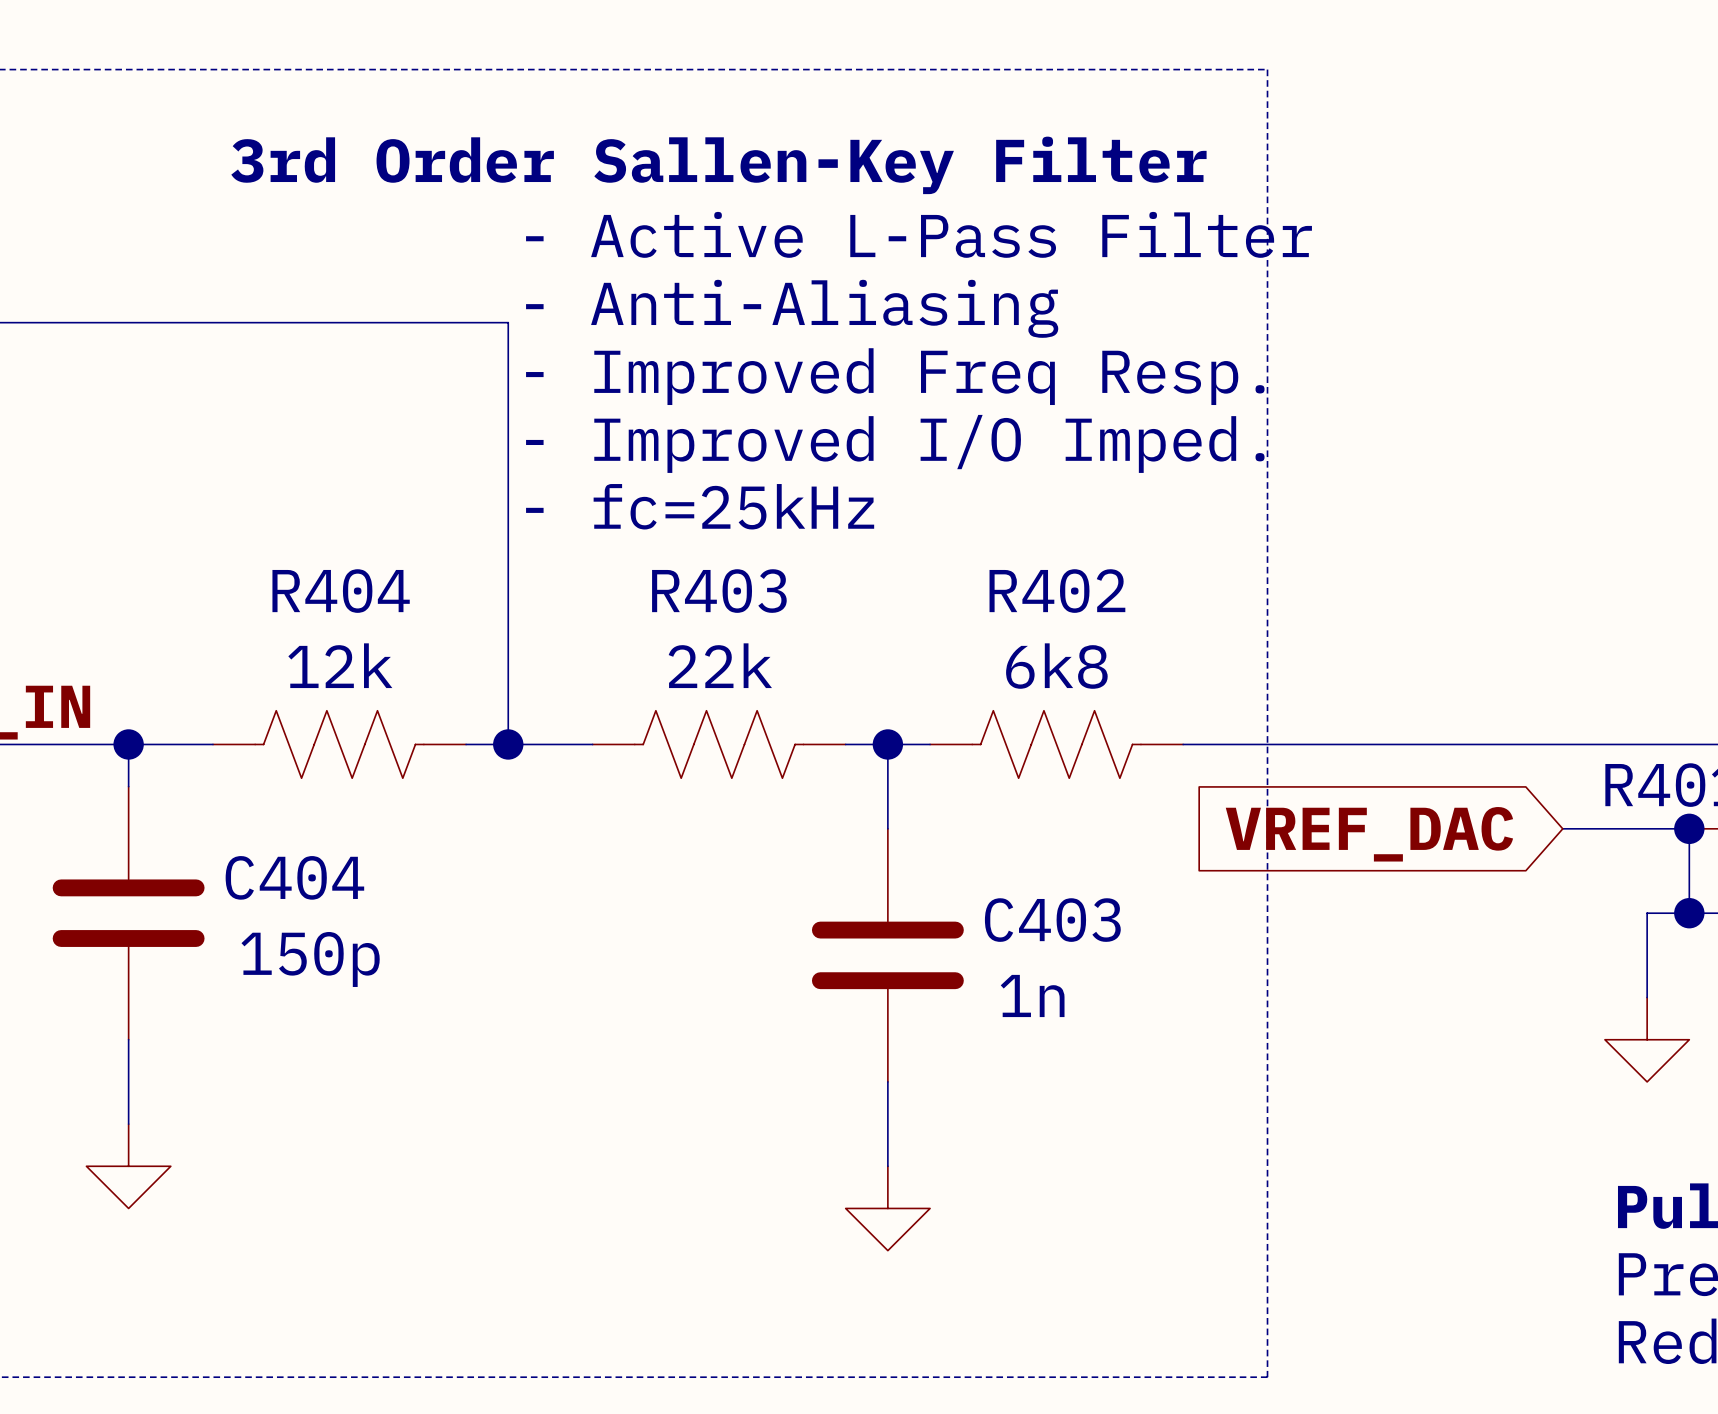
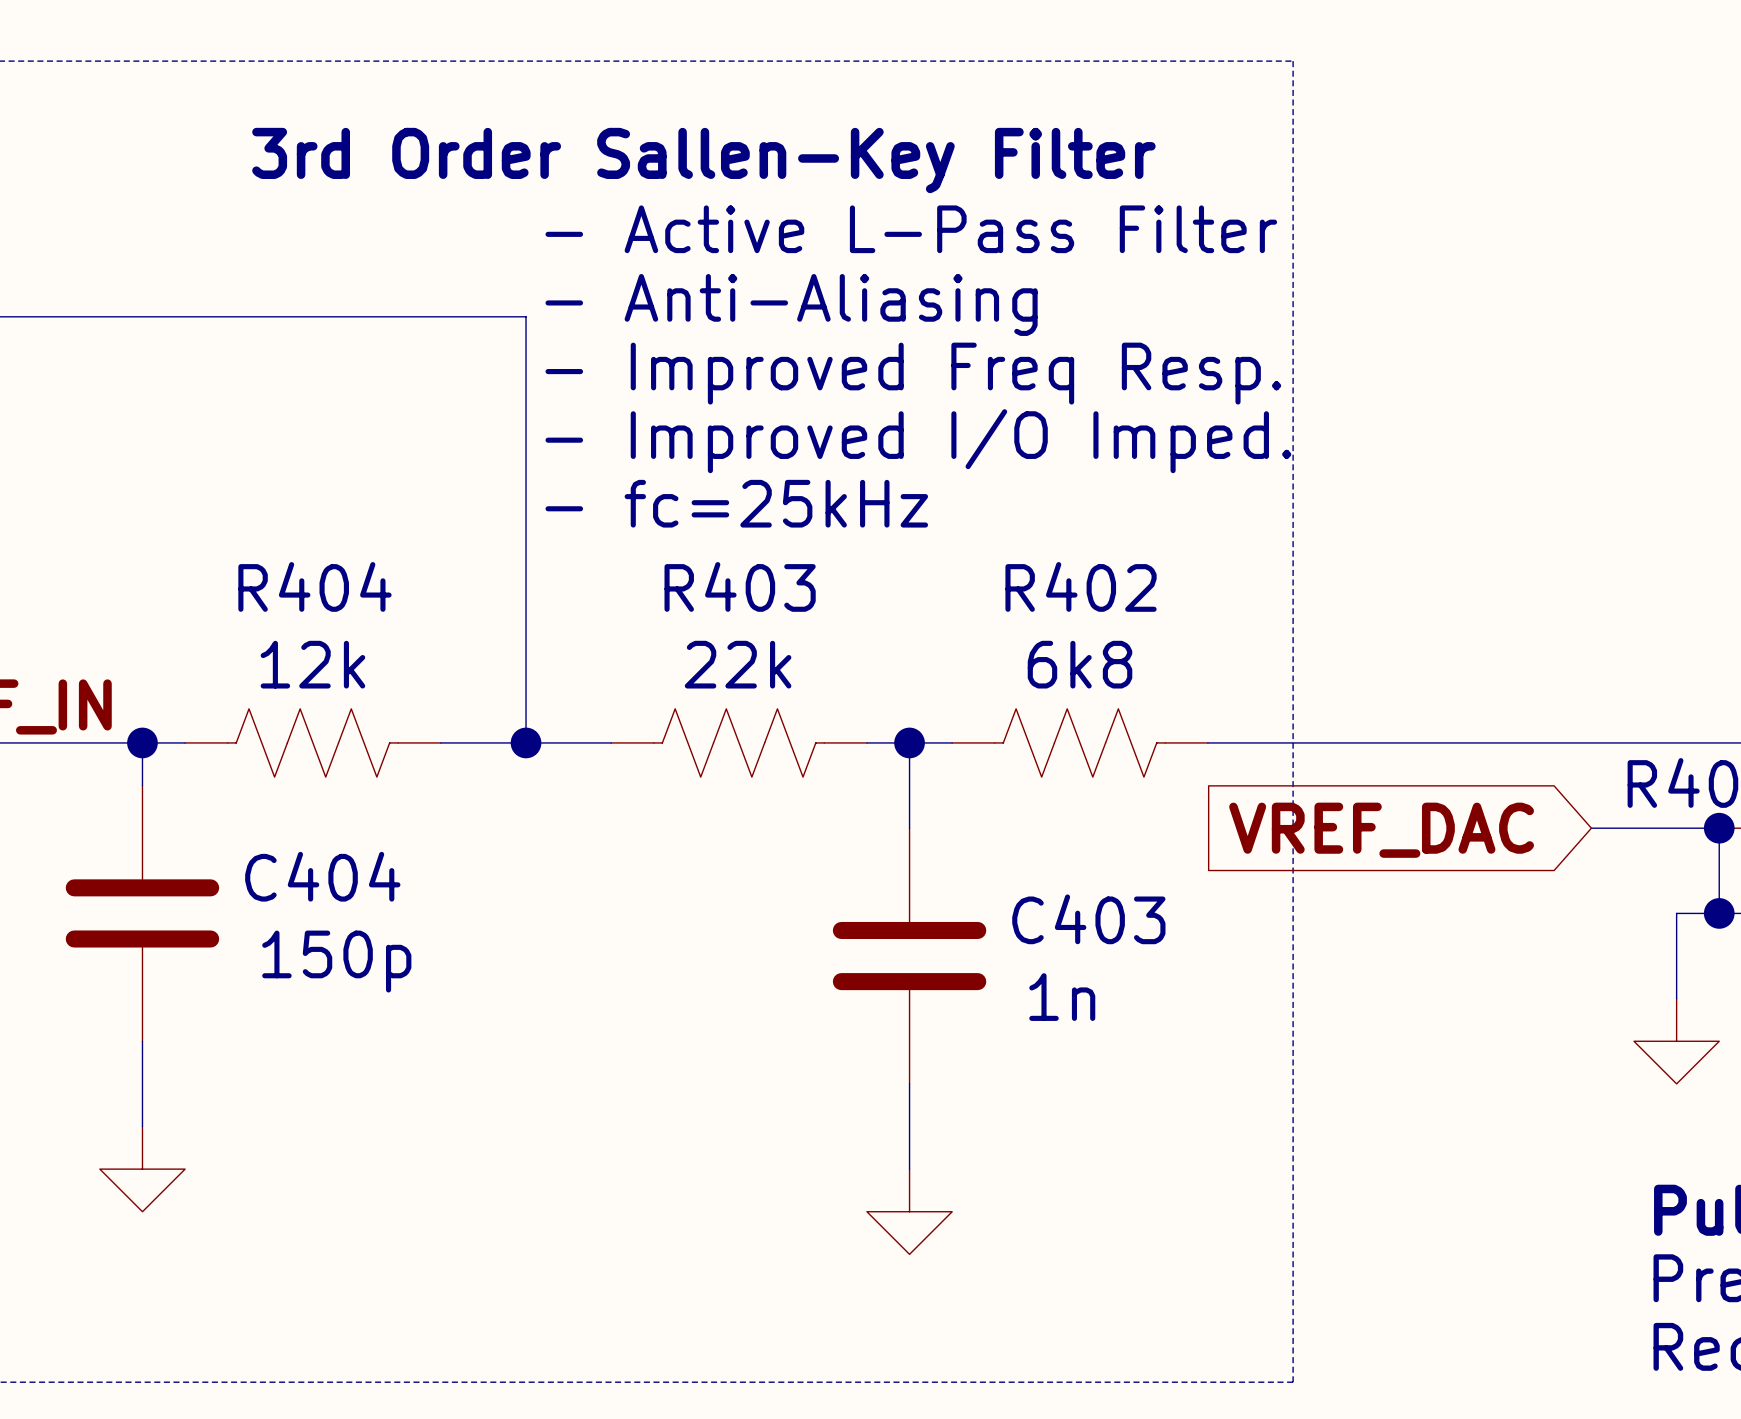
R404 position: (339, 744) -> (312, 742)

